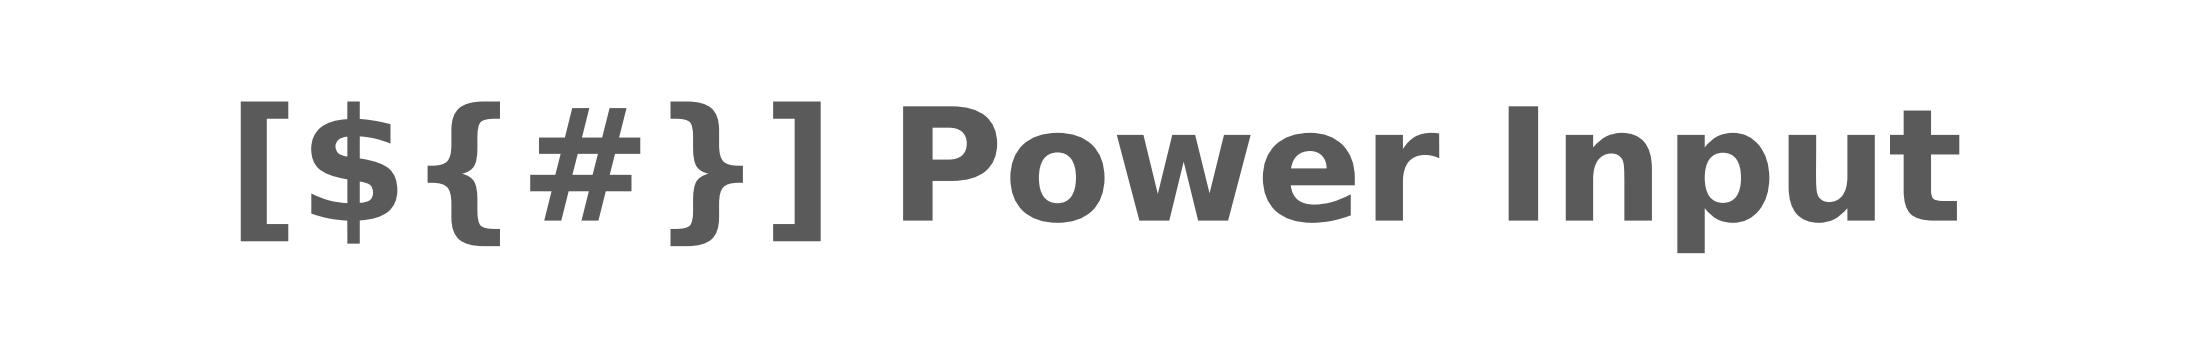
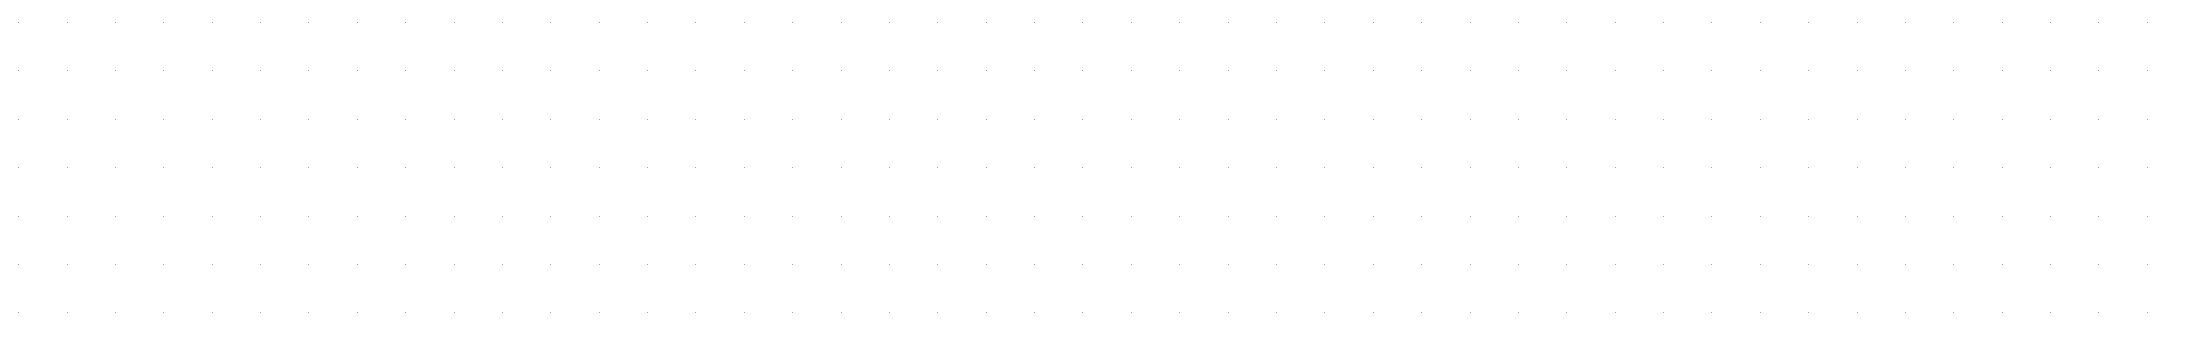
text: [${#}] Power Input (1100, 177) -> none

